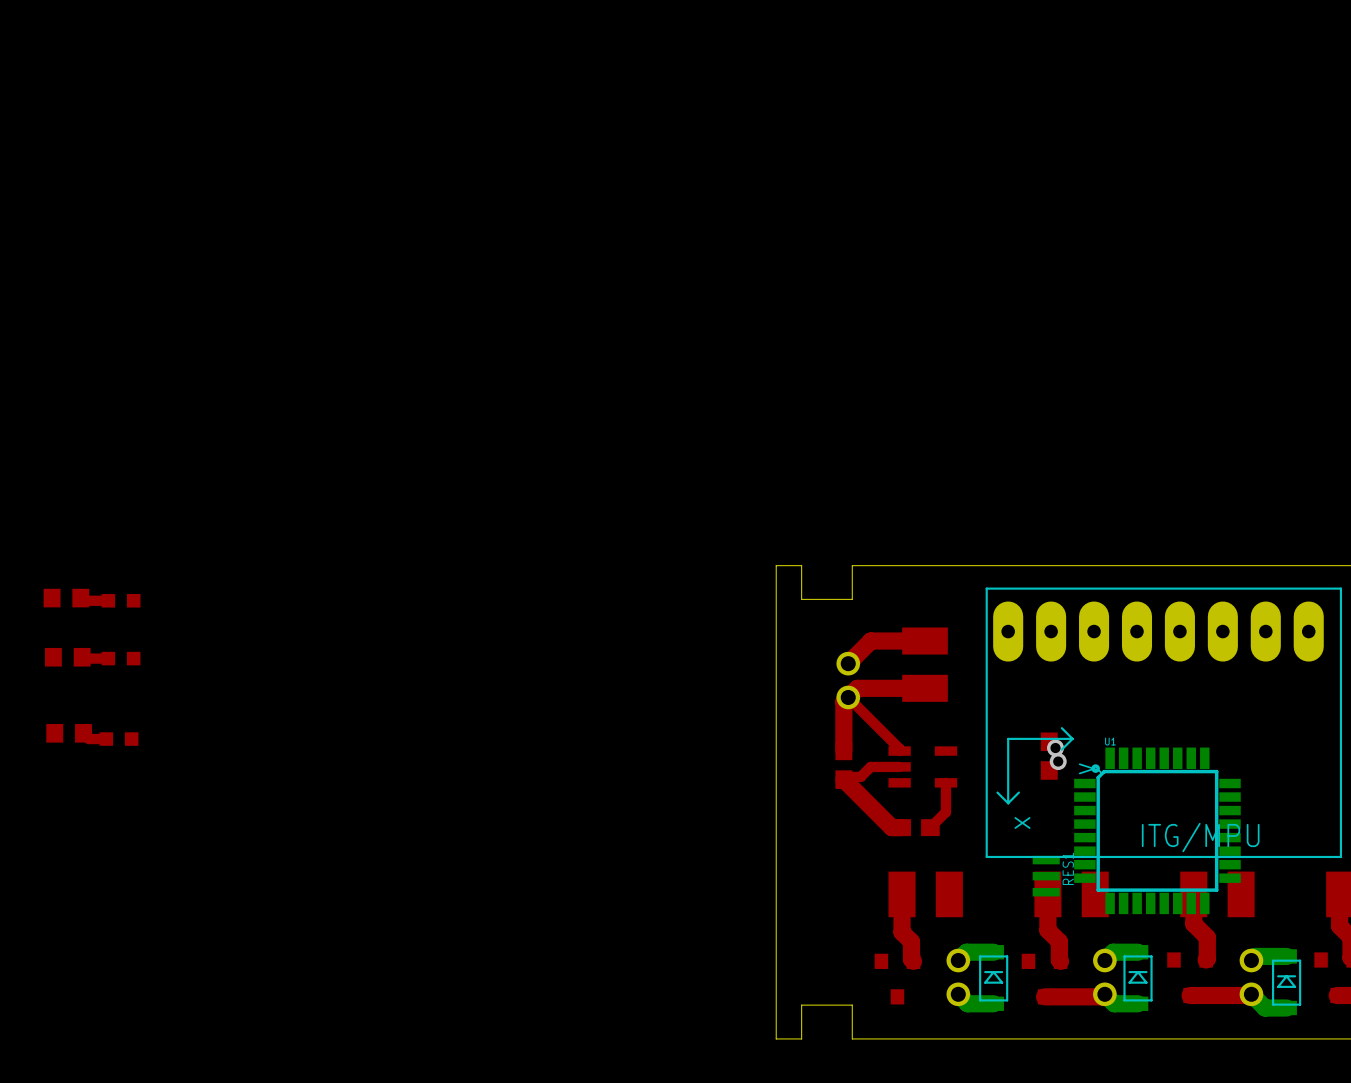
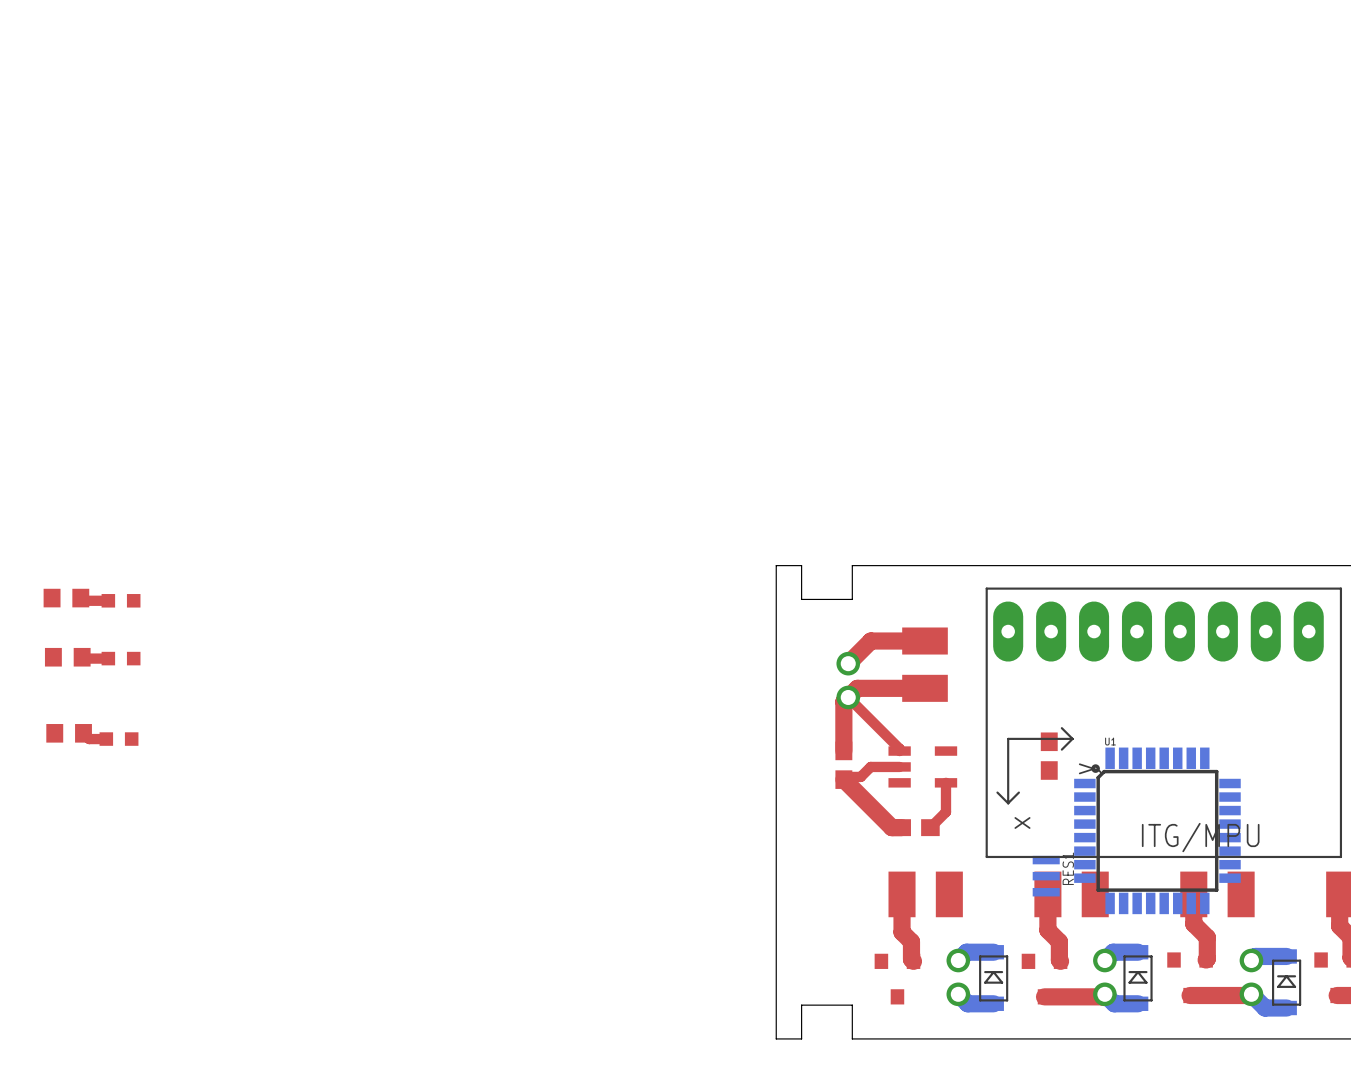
via: (1055, 748) -> none
via: (1058, 761) -> none

